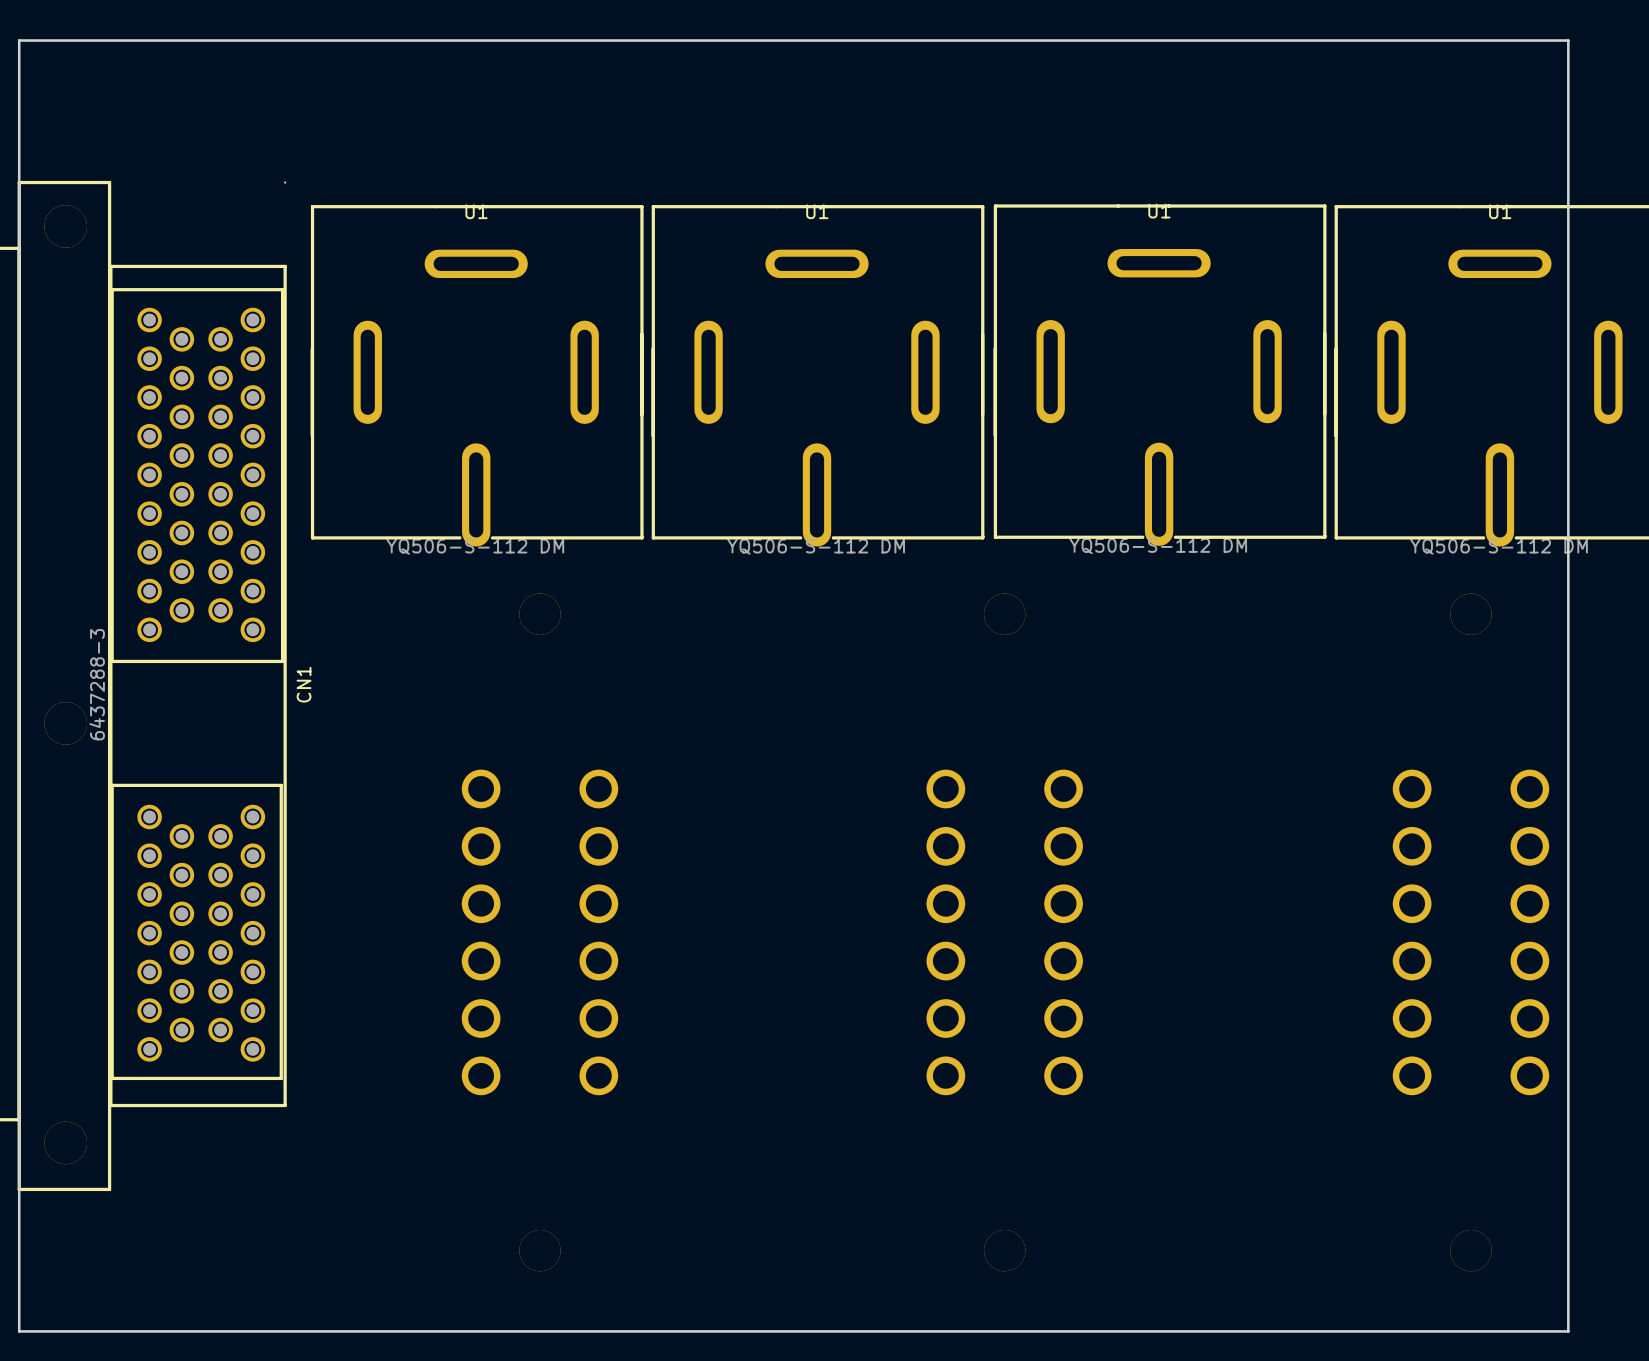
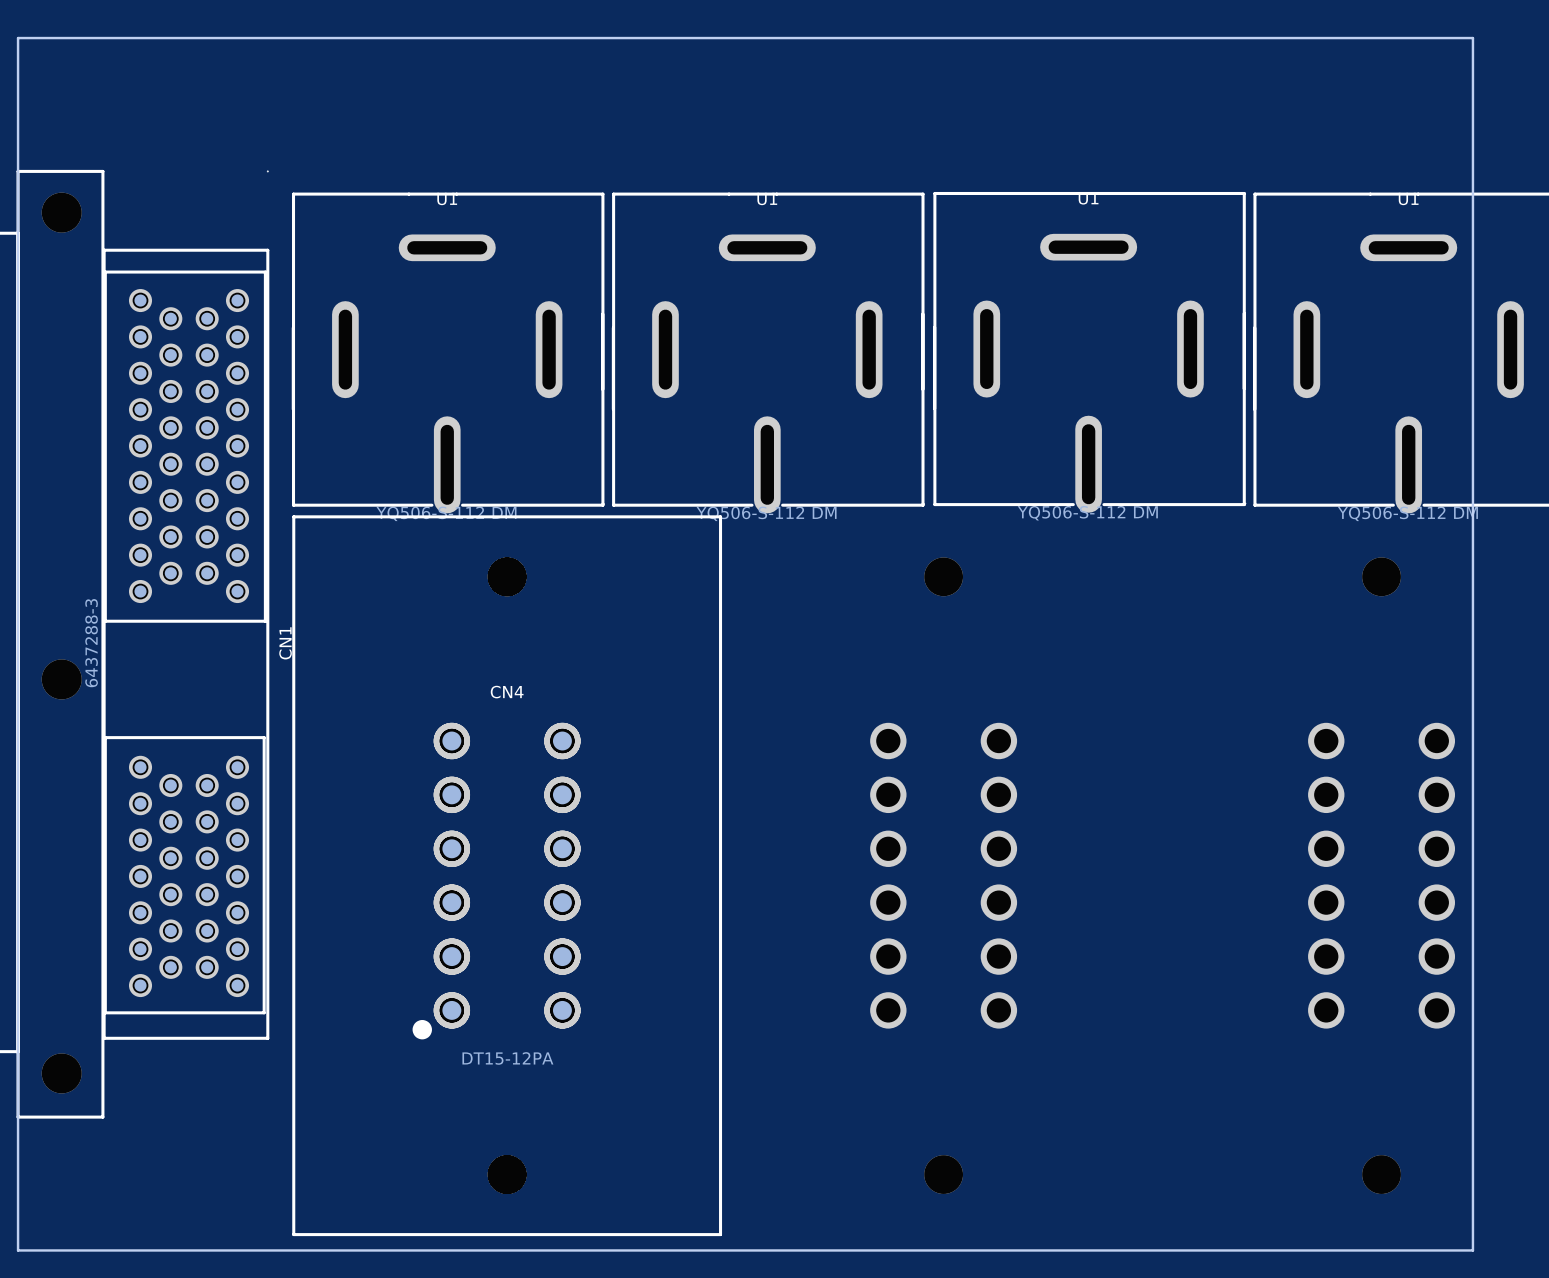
CN4: none -> DT15-12PA (507, 875)

